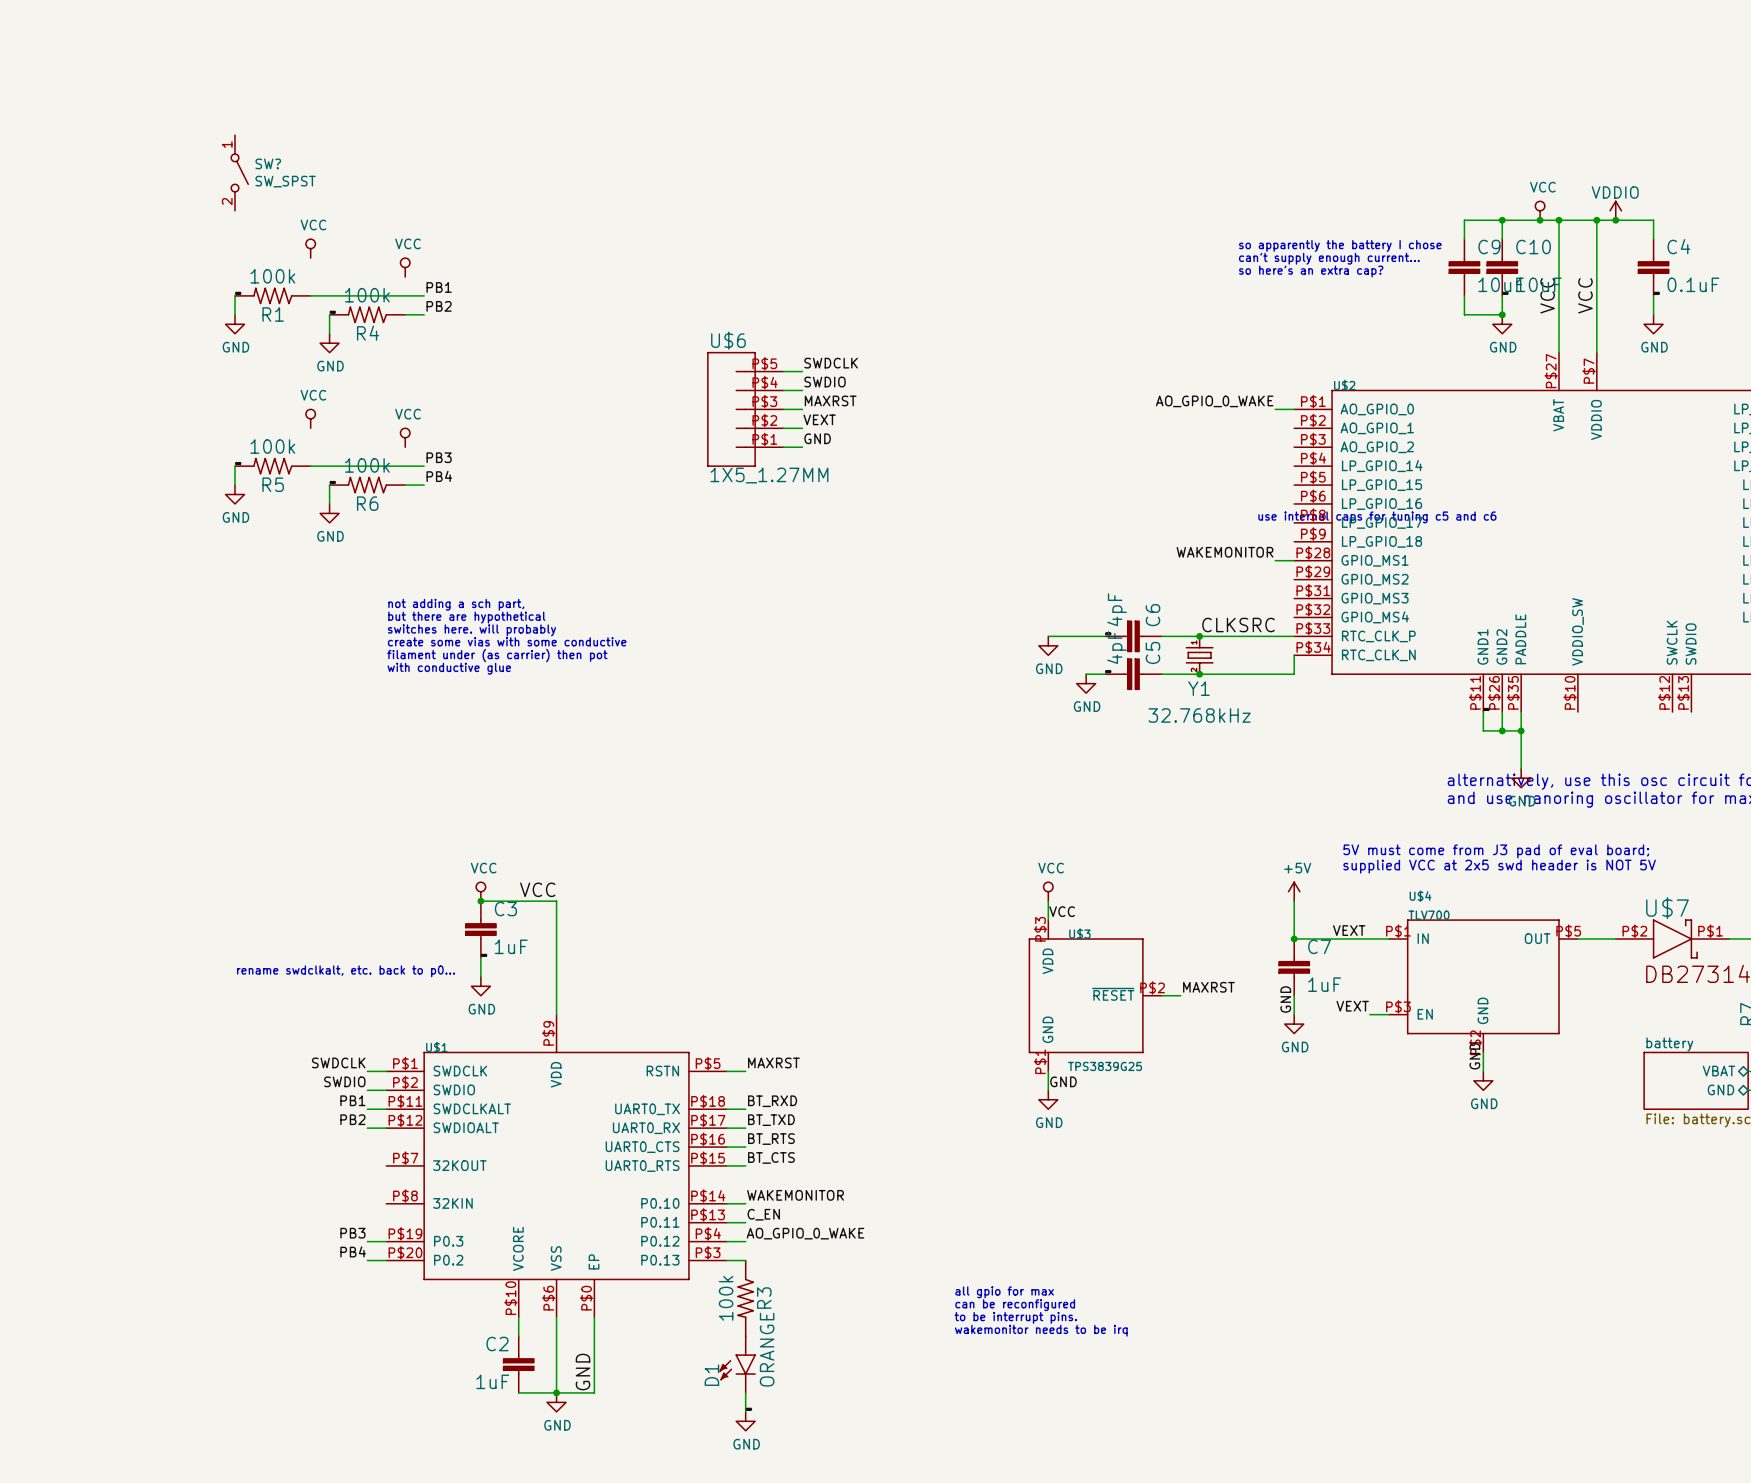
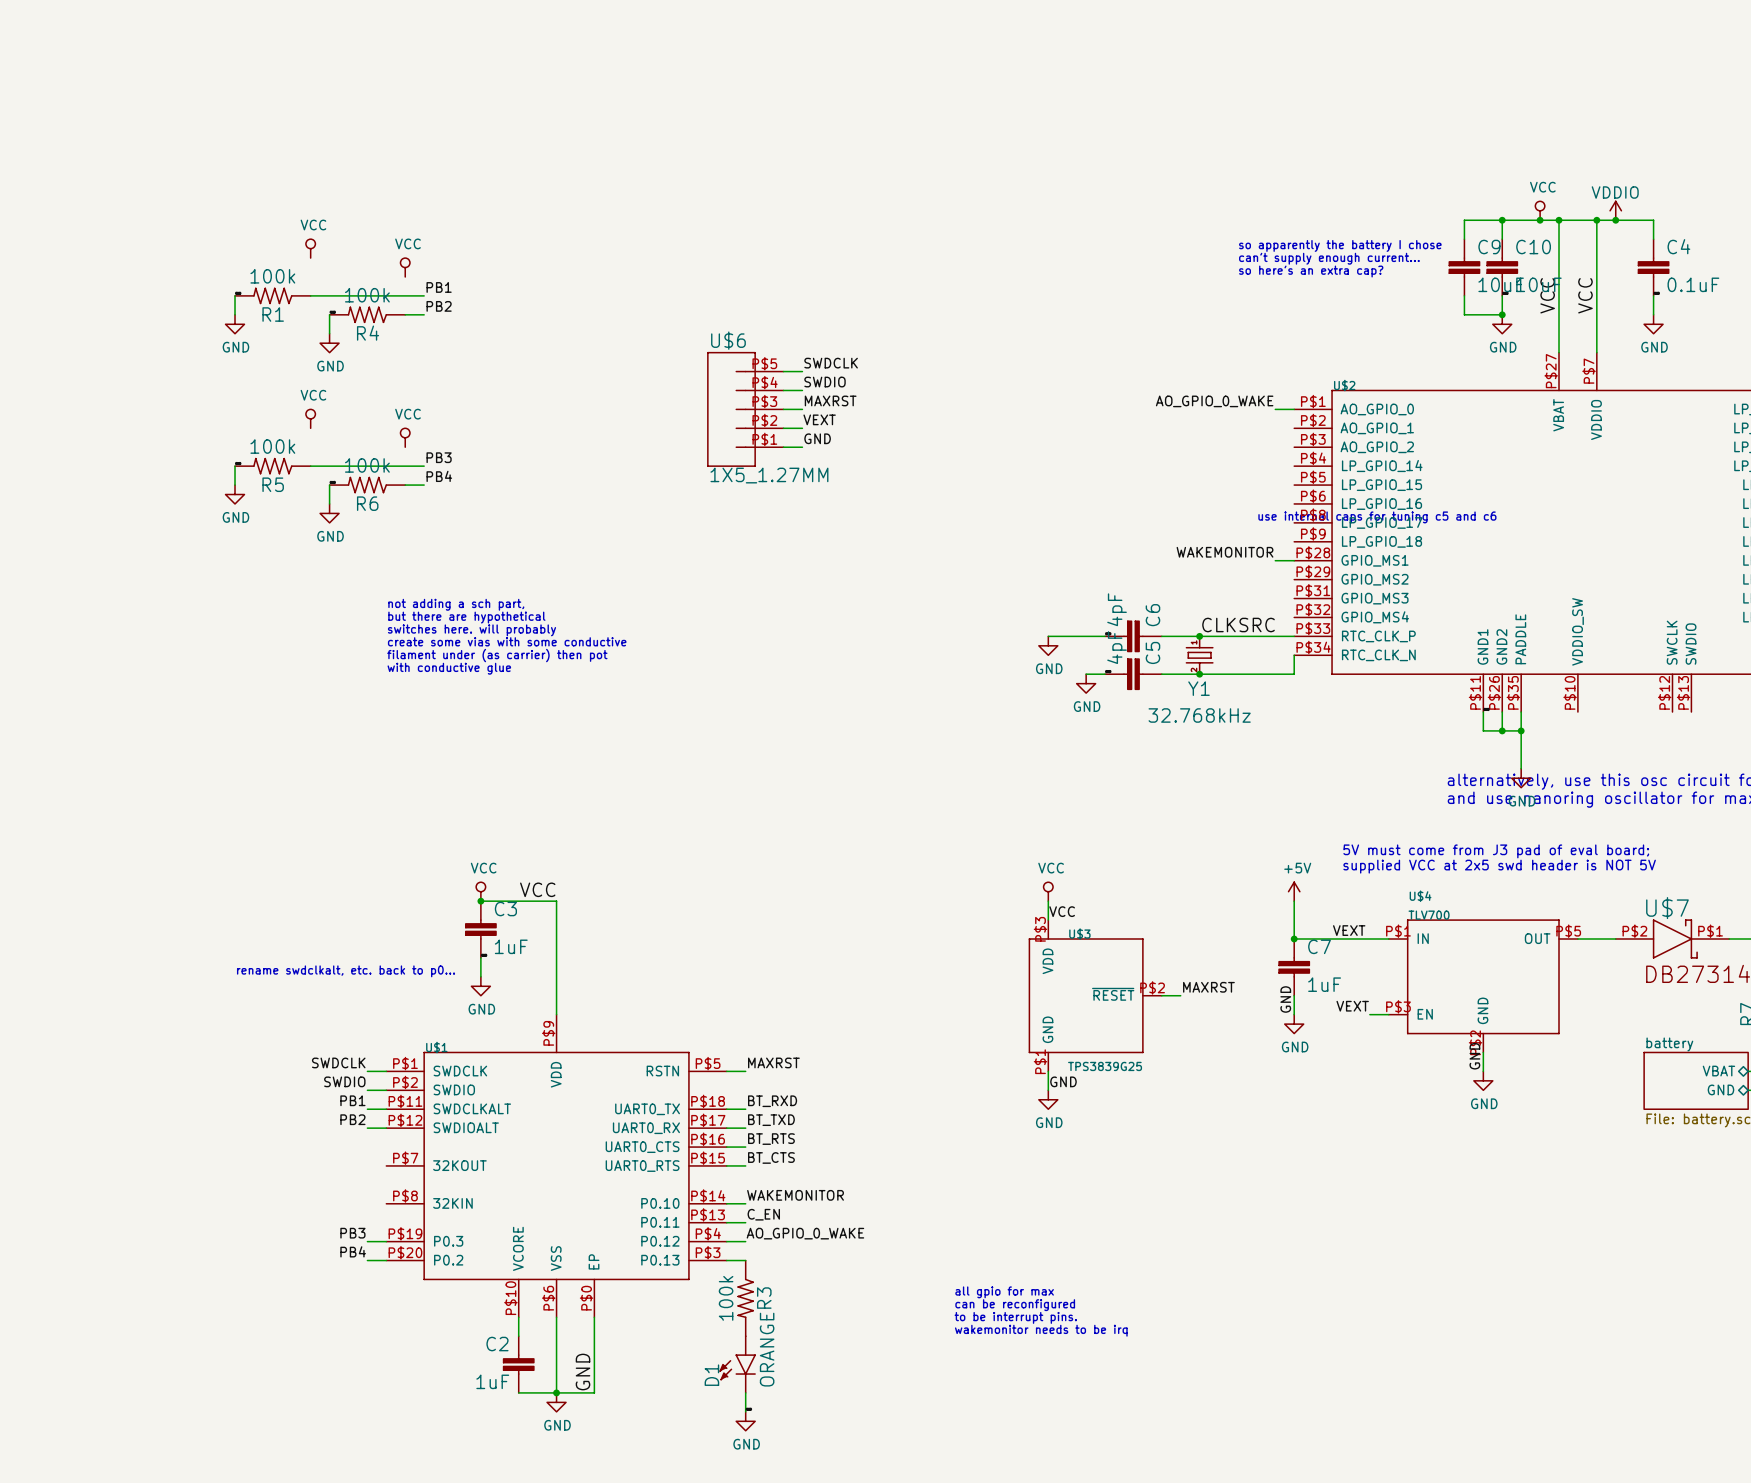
SW?: SW_SPST (239, 172) -> none

